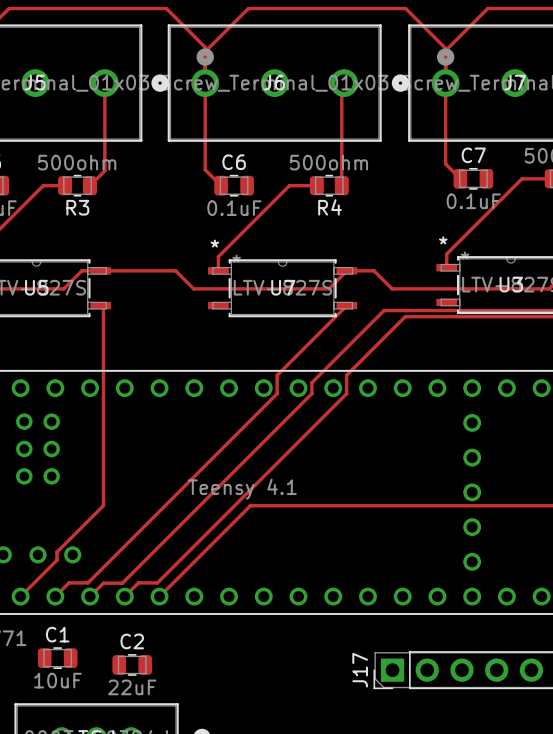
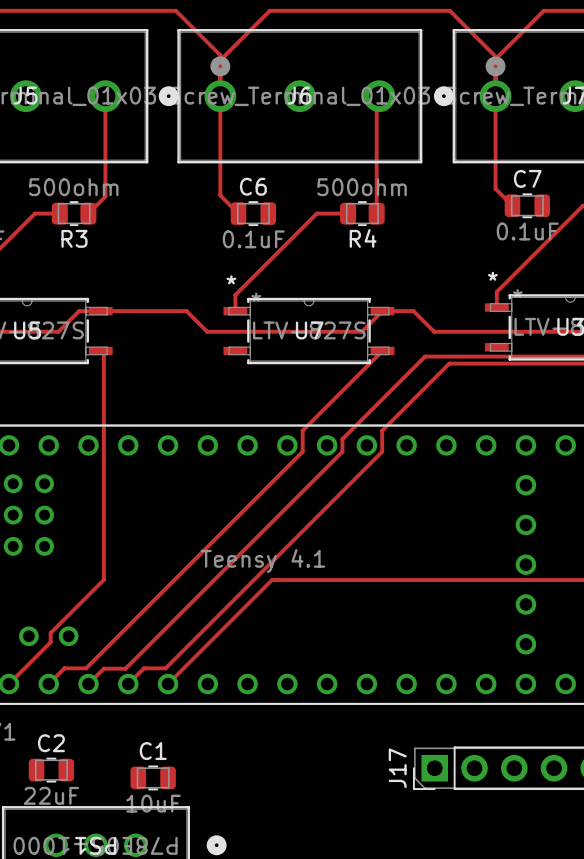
C1 position: (57, 658) -> (153, 777)
C2 position: (132, 664) -> (51, 770)

